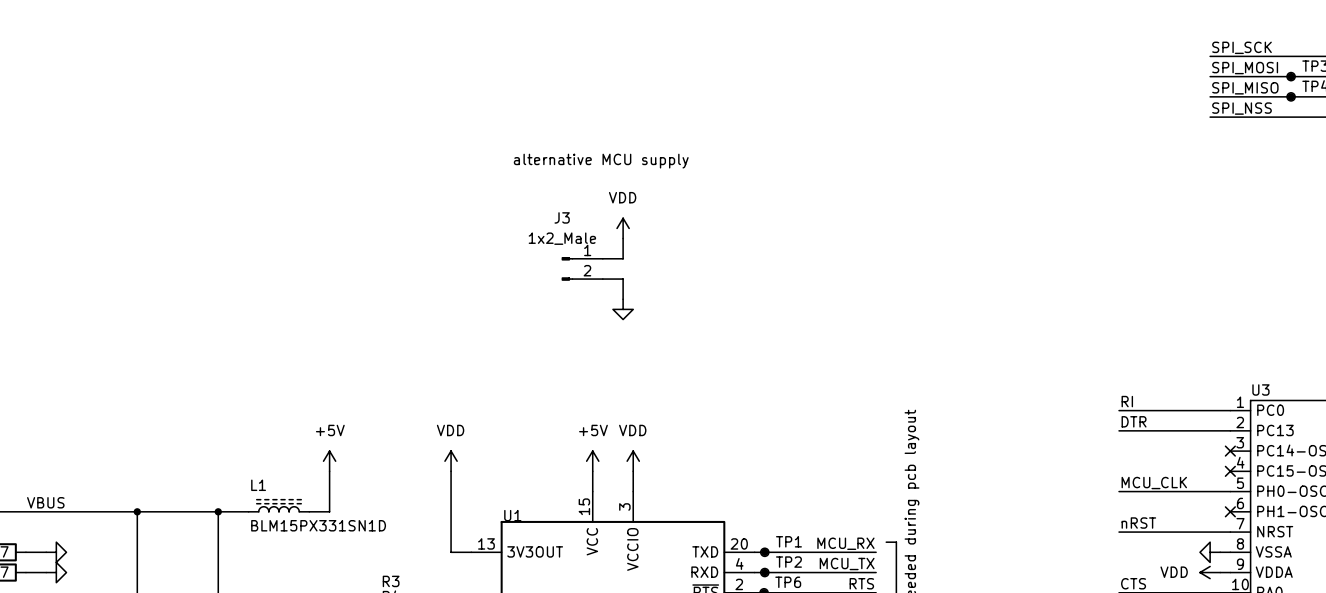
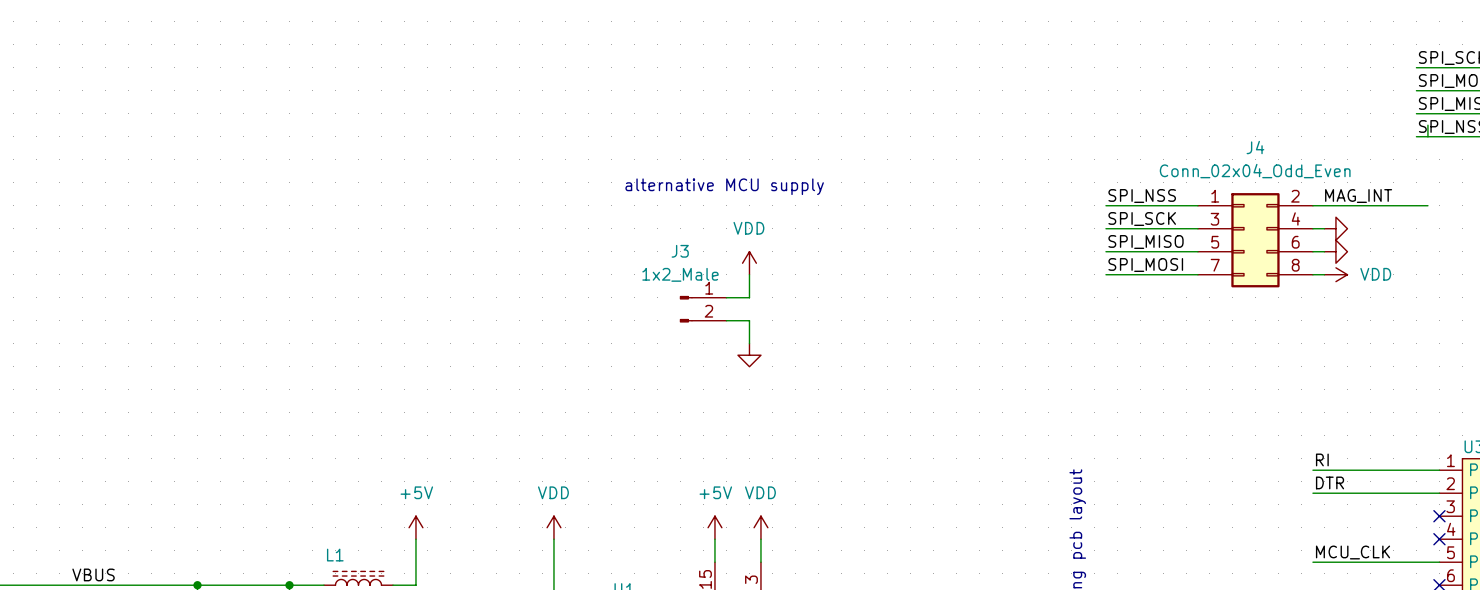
wire: none -> (1427, 125) (1427, 136)
label: none -> SPI_NSS (1142, 196)
label: none -> MAG_INT (1358, 196)
wire: none -> (1105, 205) (1197, 205)
wire: none -> (1312, 205) (1427, 205)
label: none -> SPI_SCK (1142, 219)
wire: none -> (1105, 228) (1197, 228)
wire: none -> (1312, 228) (1324, 228)
power symbol: none -> (1335, 228)
J4: none -> Conn_02x04_Odd_Even (1255, 240)
label: none -> SPI_MISO (1146, 242)
wire: none -> (1105, 251) (1197, 251)
wire: none -> (1312, 251) (1324, 251)
power symbol: none -> (1335, 251)
label: none -> SPI_MOSI (1145, 265)
wire: none -> (1105, 274) (1197, 274)
wire: none -> (1312, 274) (1324, 274)
power symbol: none -> VDD (1335, 274)

